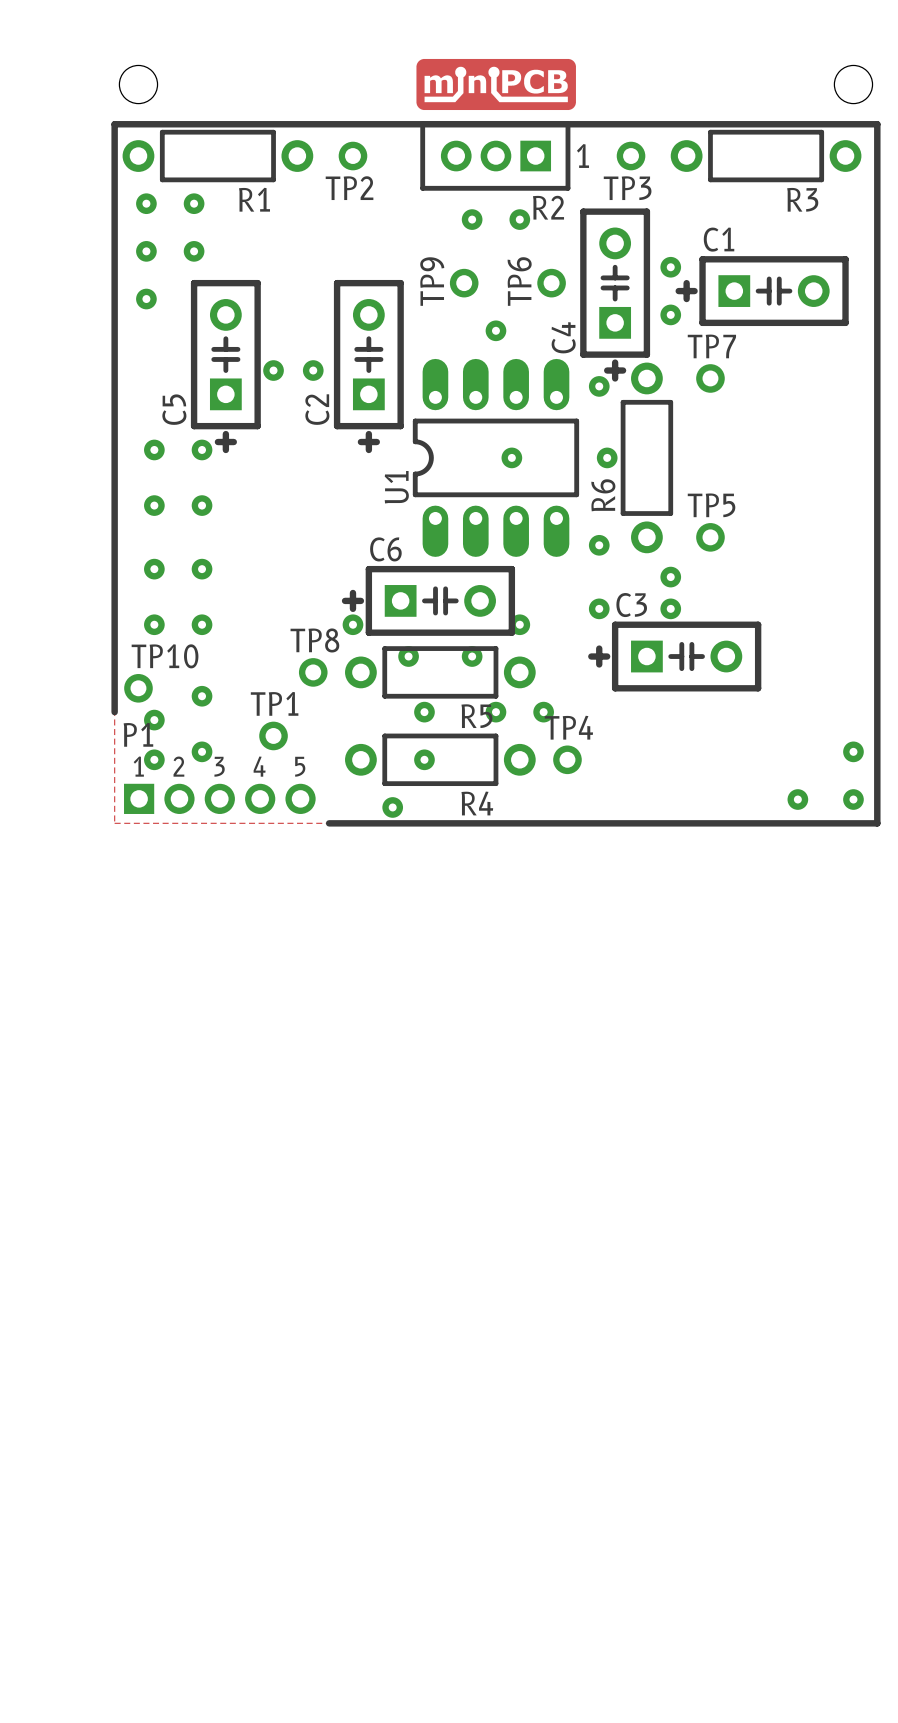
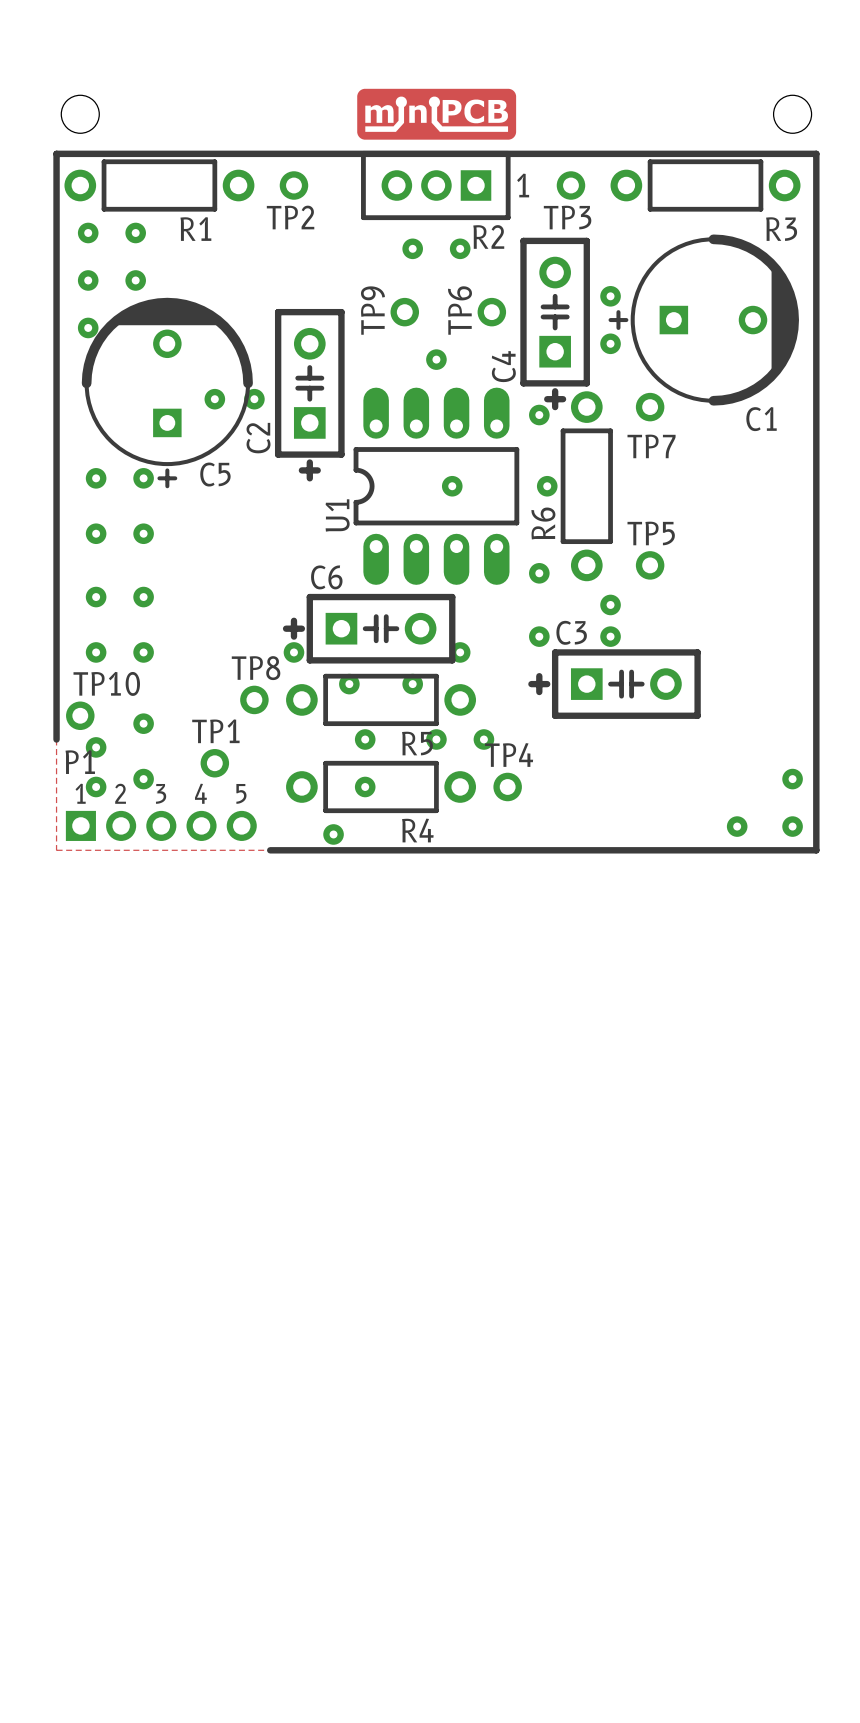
R3 name position: R3 (802, 199) -> R3 (781, 229)
C1 name position: C1 (719, 239) -> C1 (761, 419)
C1 footprint: [675, 256, 849, 327] -> [608, 234, 799, 406]
C5 footprint: [190, 279, 261, 454] -> [81, 297, 253, 489]
TP7 name position: TP7 (711, 346) -> TP7 (651, 446)
C5 name position: C5 (174, 409) -> C5 (215, 474)

